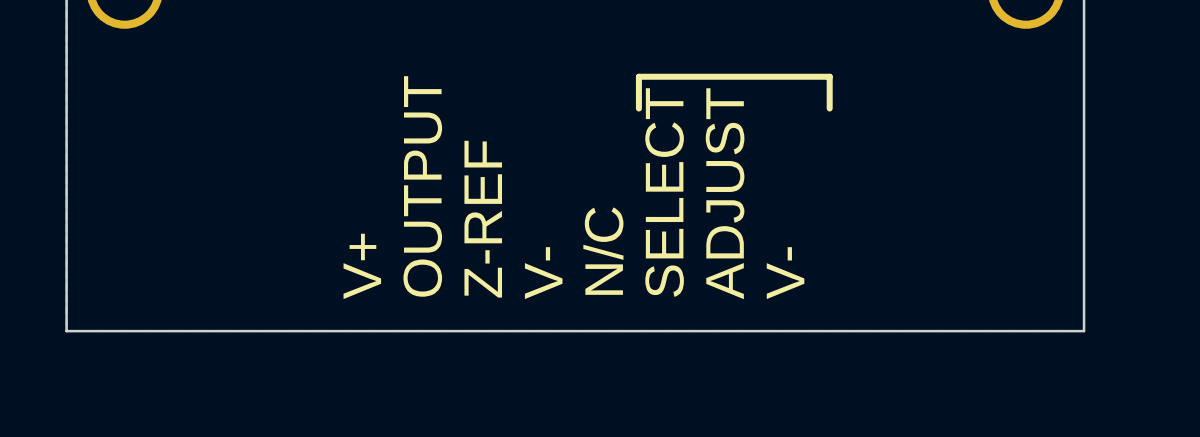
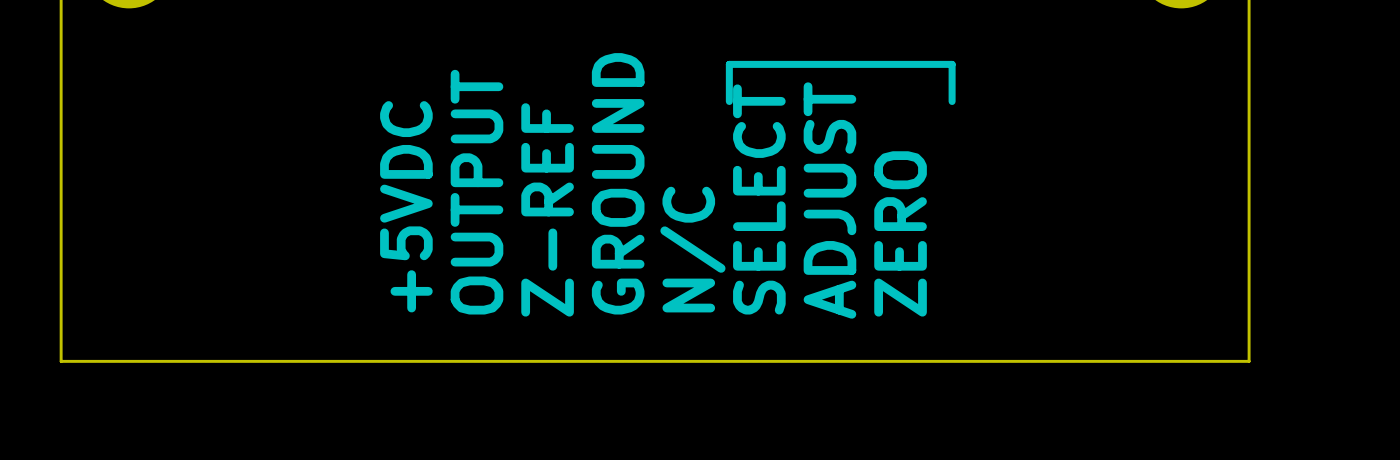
text: V+ (362, 266) -> +5VDC (406, 206)
text: V- (543, 273) -> GROUND (618, 183)
text: V- (785, 273) -> ZERO (900, 233)

